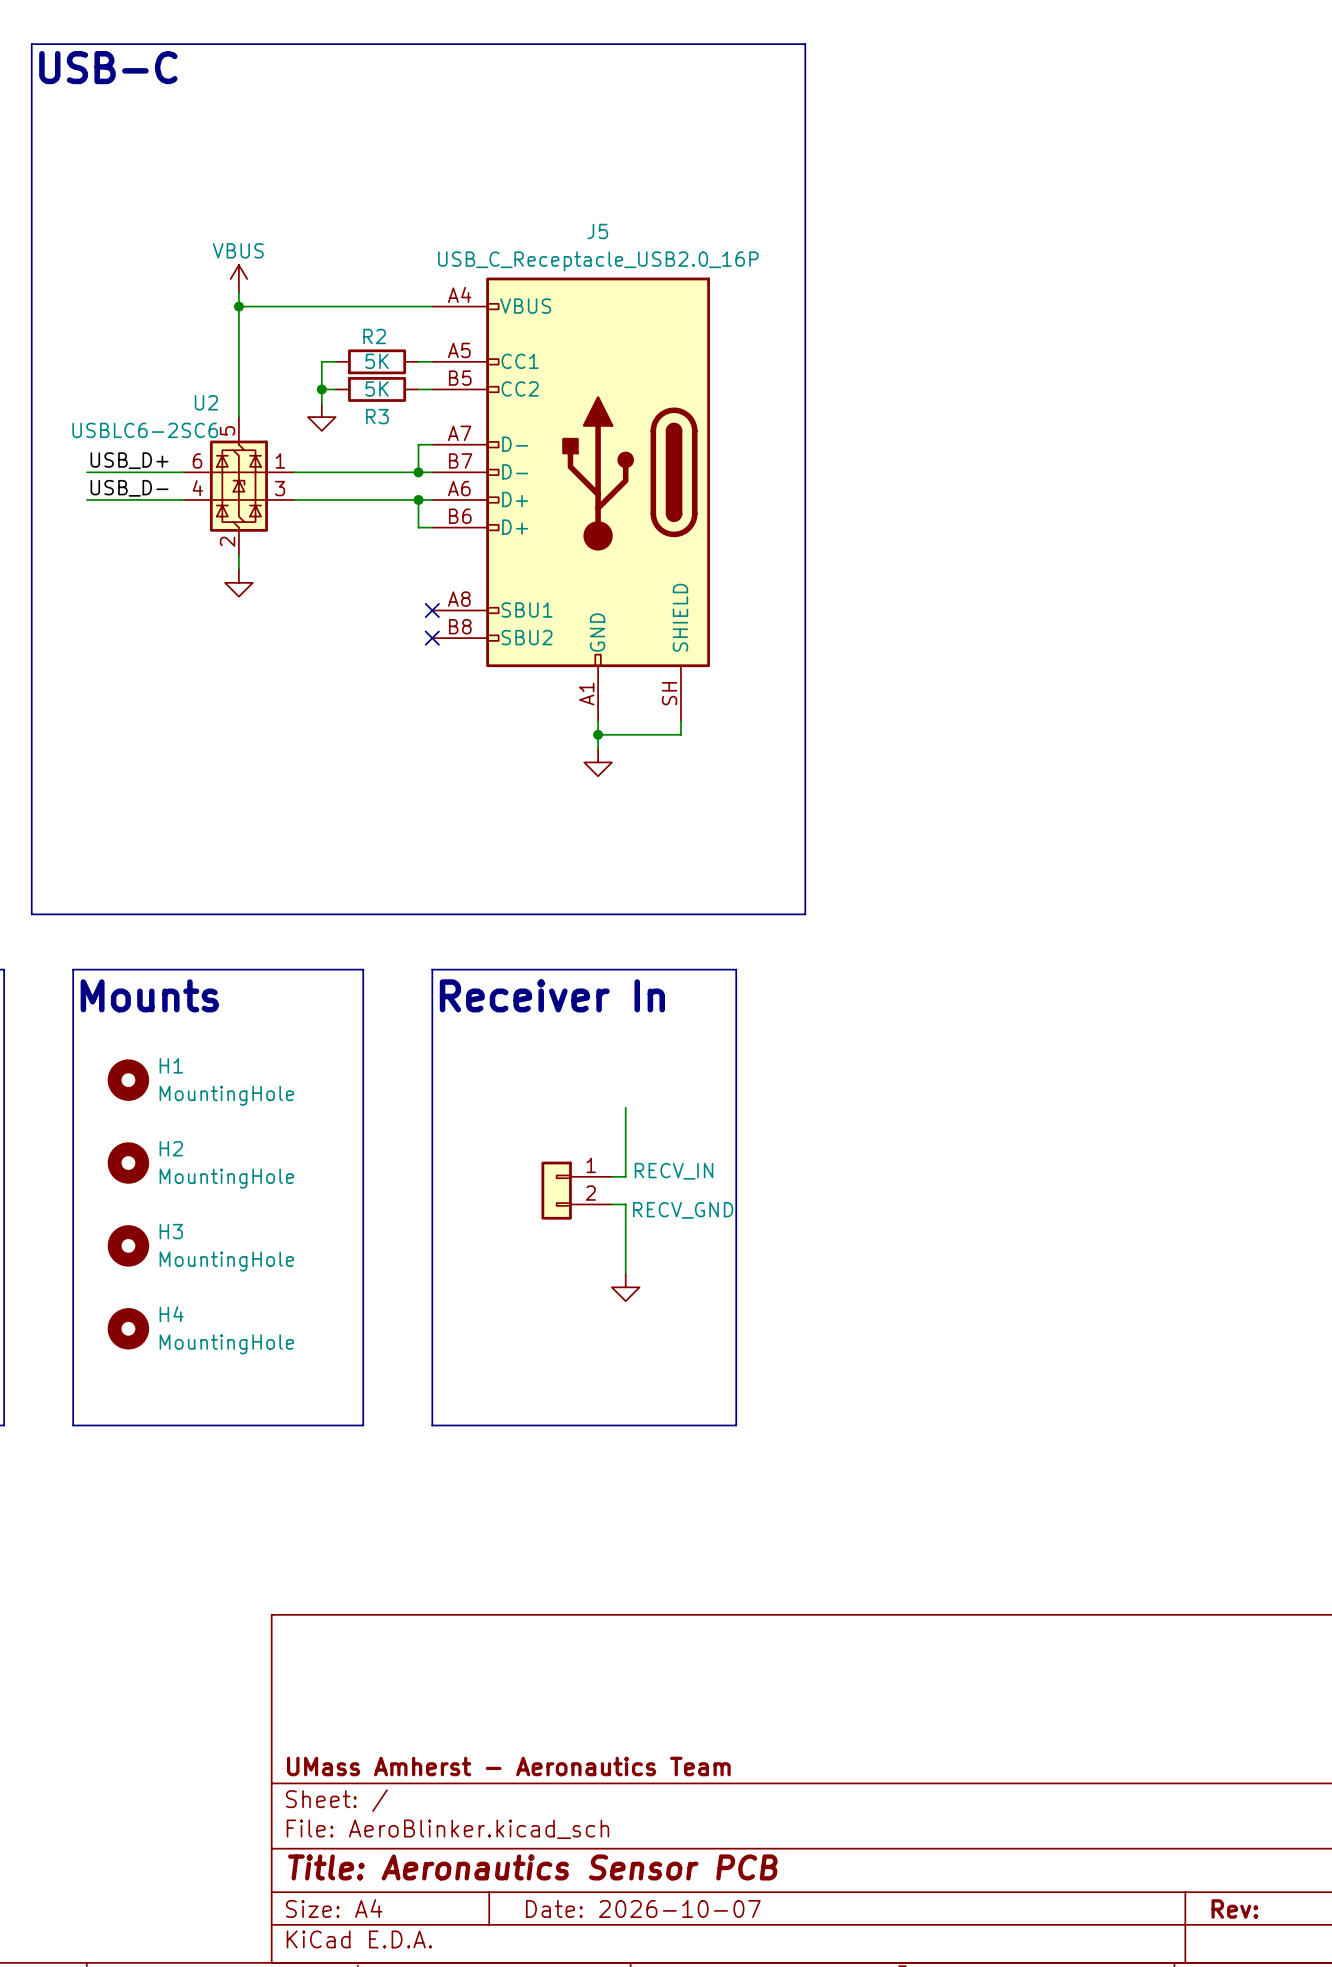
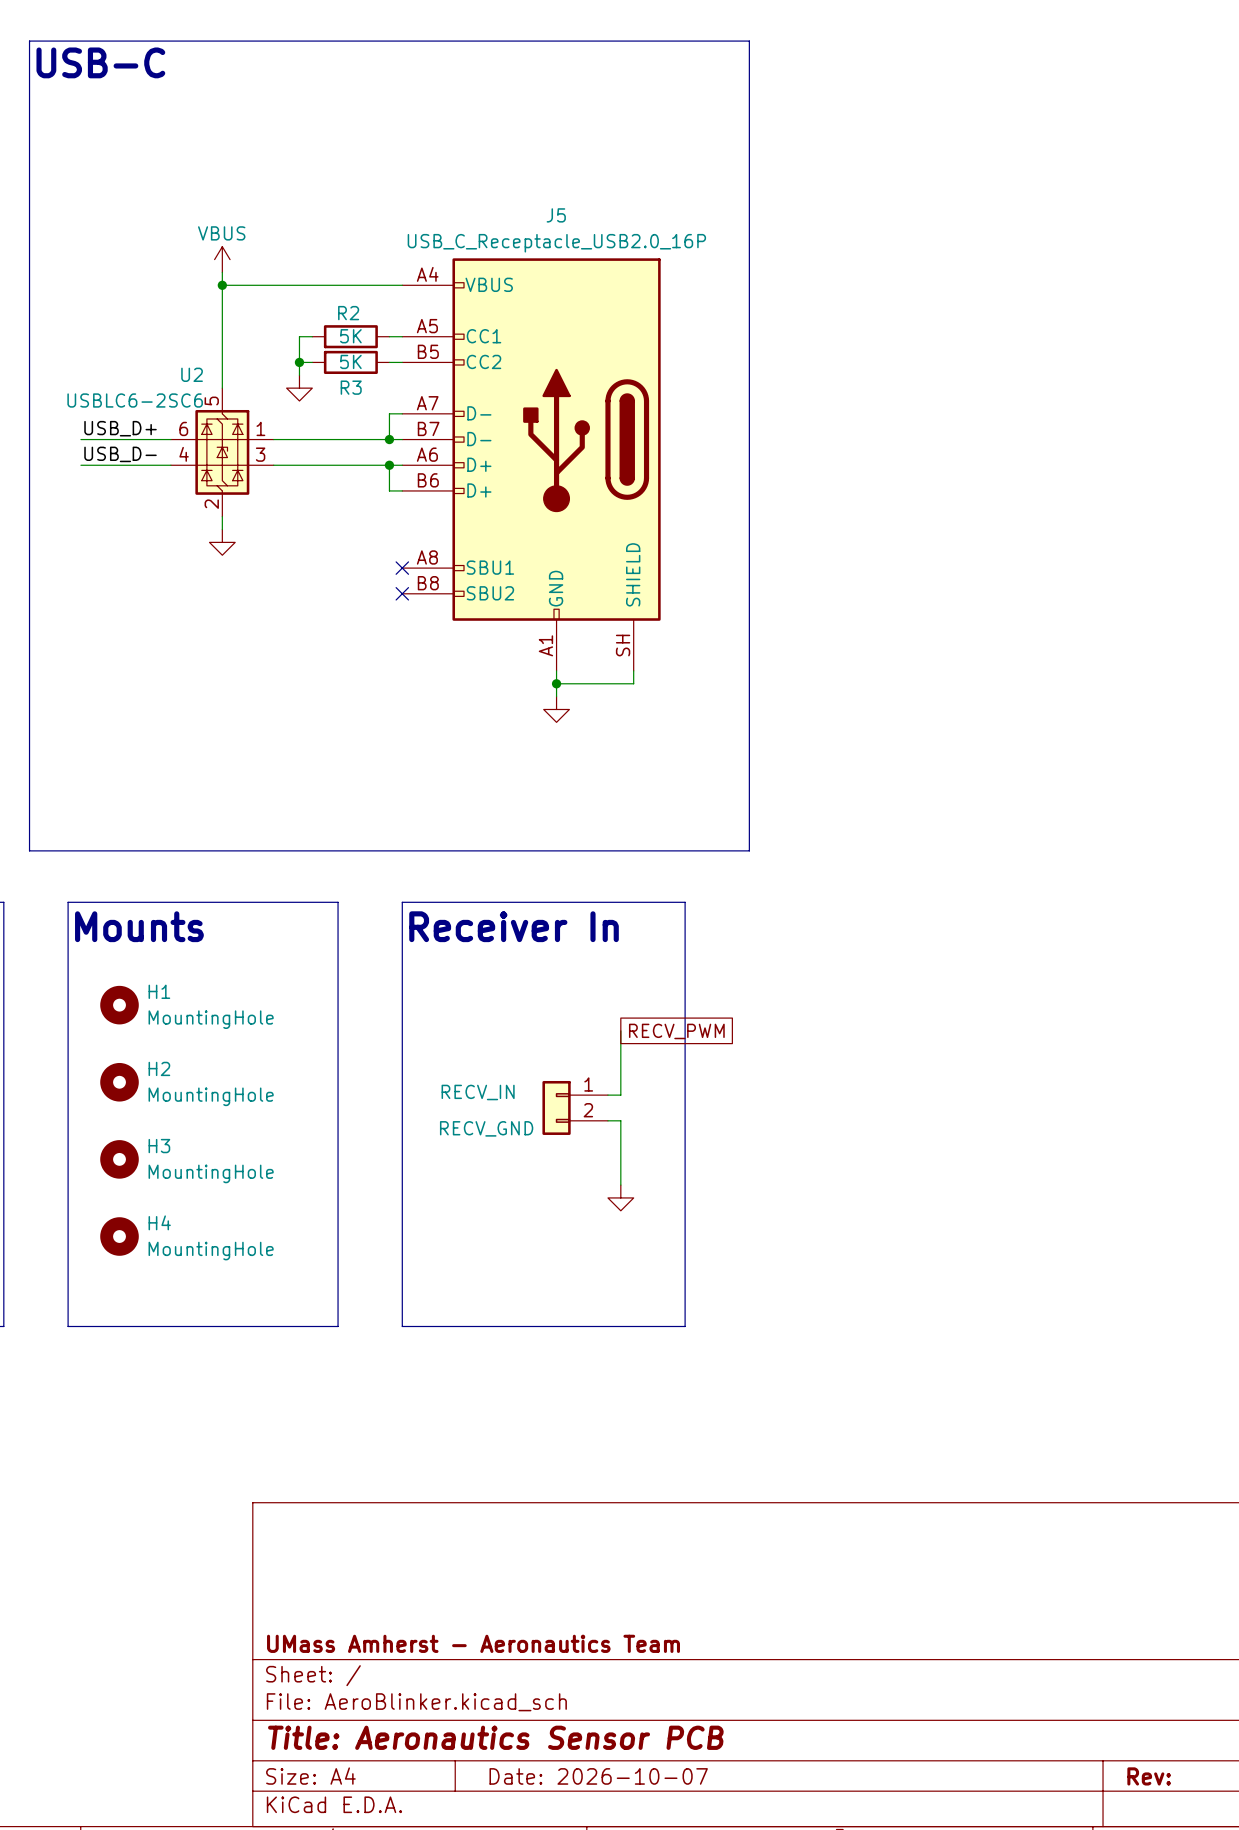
wire: (625, 1107) (625, 1176) (611, 1176) -> (620, 1030) (620, 1095) (607, 1095)
global label: none -> RECV_PWM (676, 1031)
RECV_IN name position: RECV_IN (674, 1171) -> RECV_IN (478, 1092)
RECV_IN position: (576, 1190) -> (575, 1107)
wire: (611, 1204) (625, 1204) (625, 1273) -> (607, 1120) (620, 1120) (620, 1185)
RECV_IN value position: RECV_GND (683, 1210) -> RECV_GND (486, 1128)
power symbol position: (625, 1287) -> (620, 1197)

